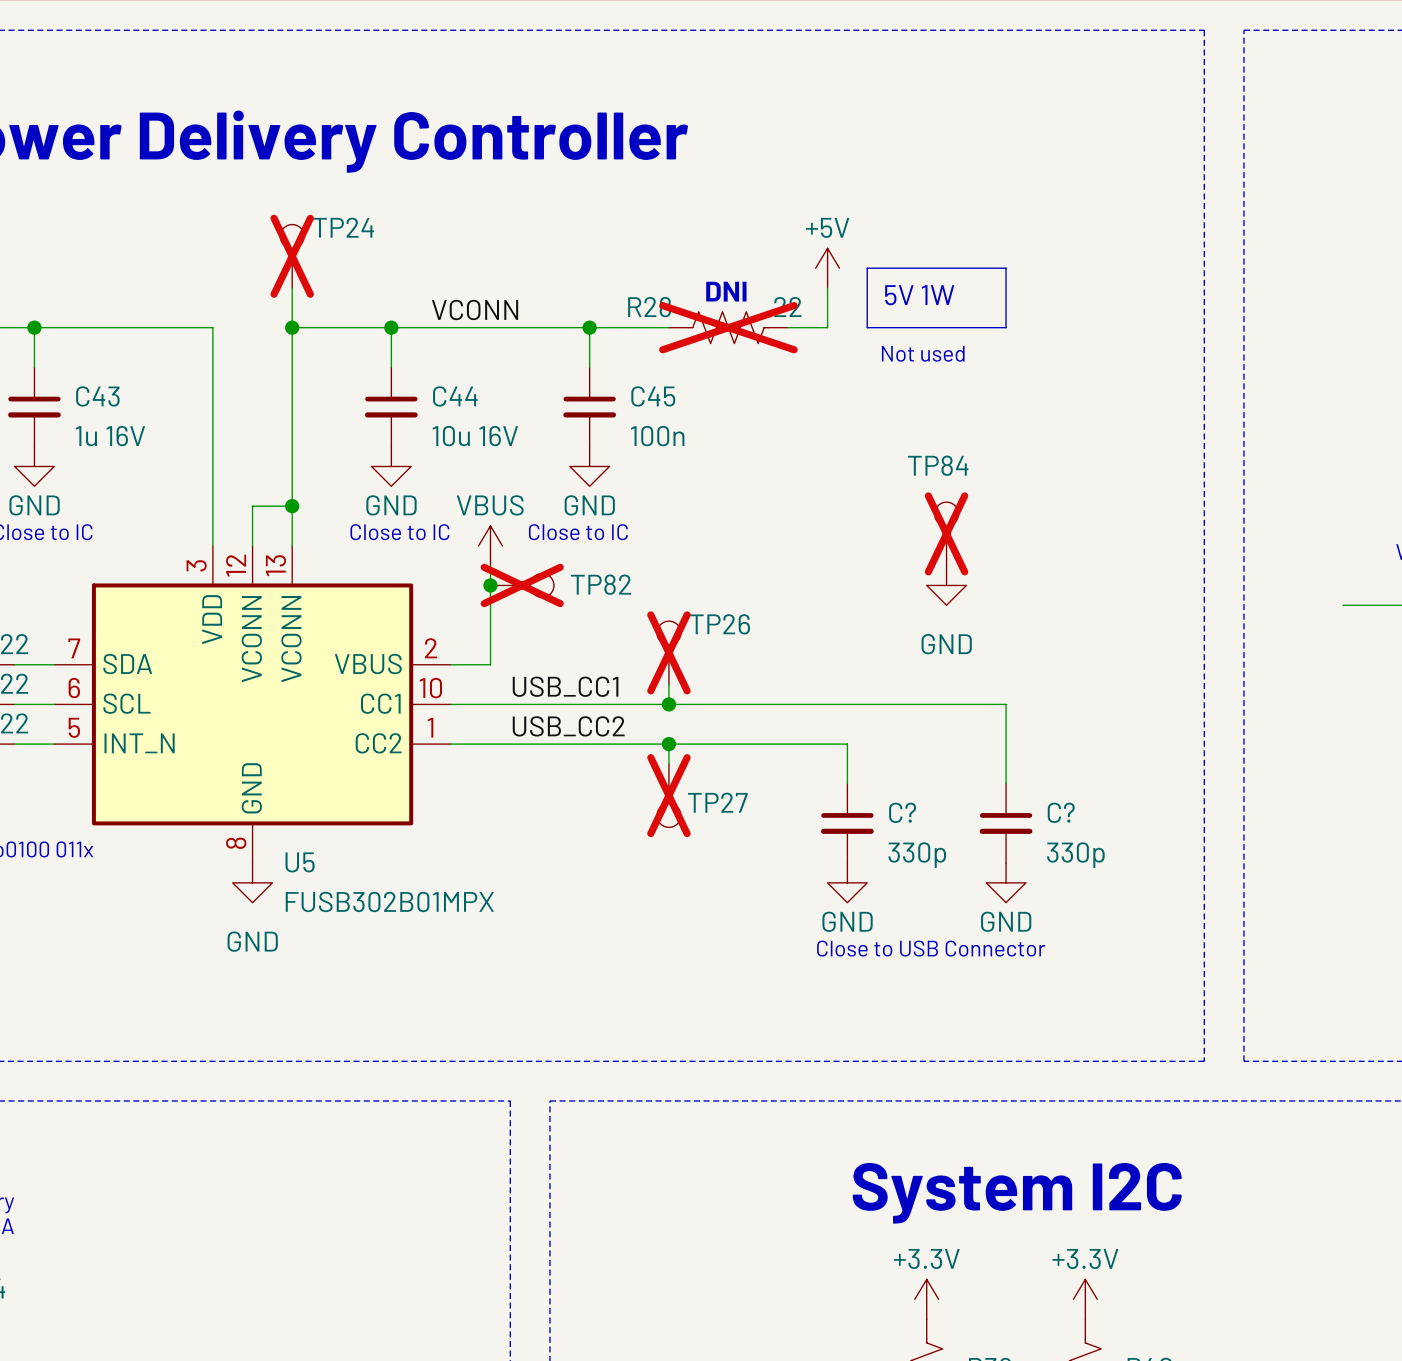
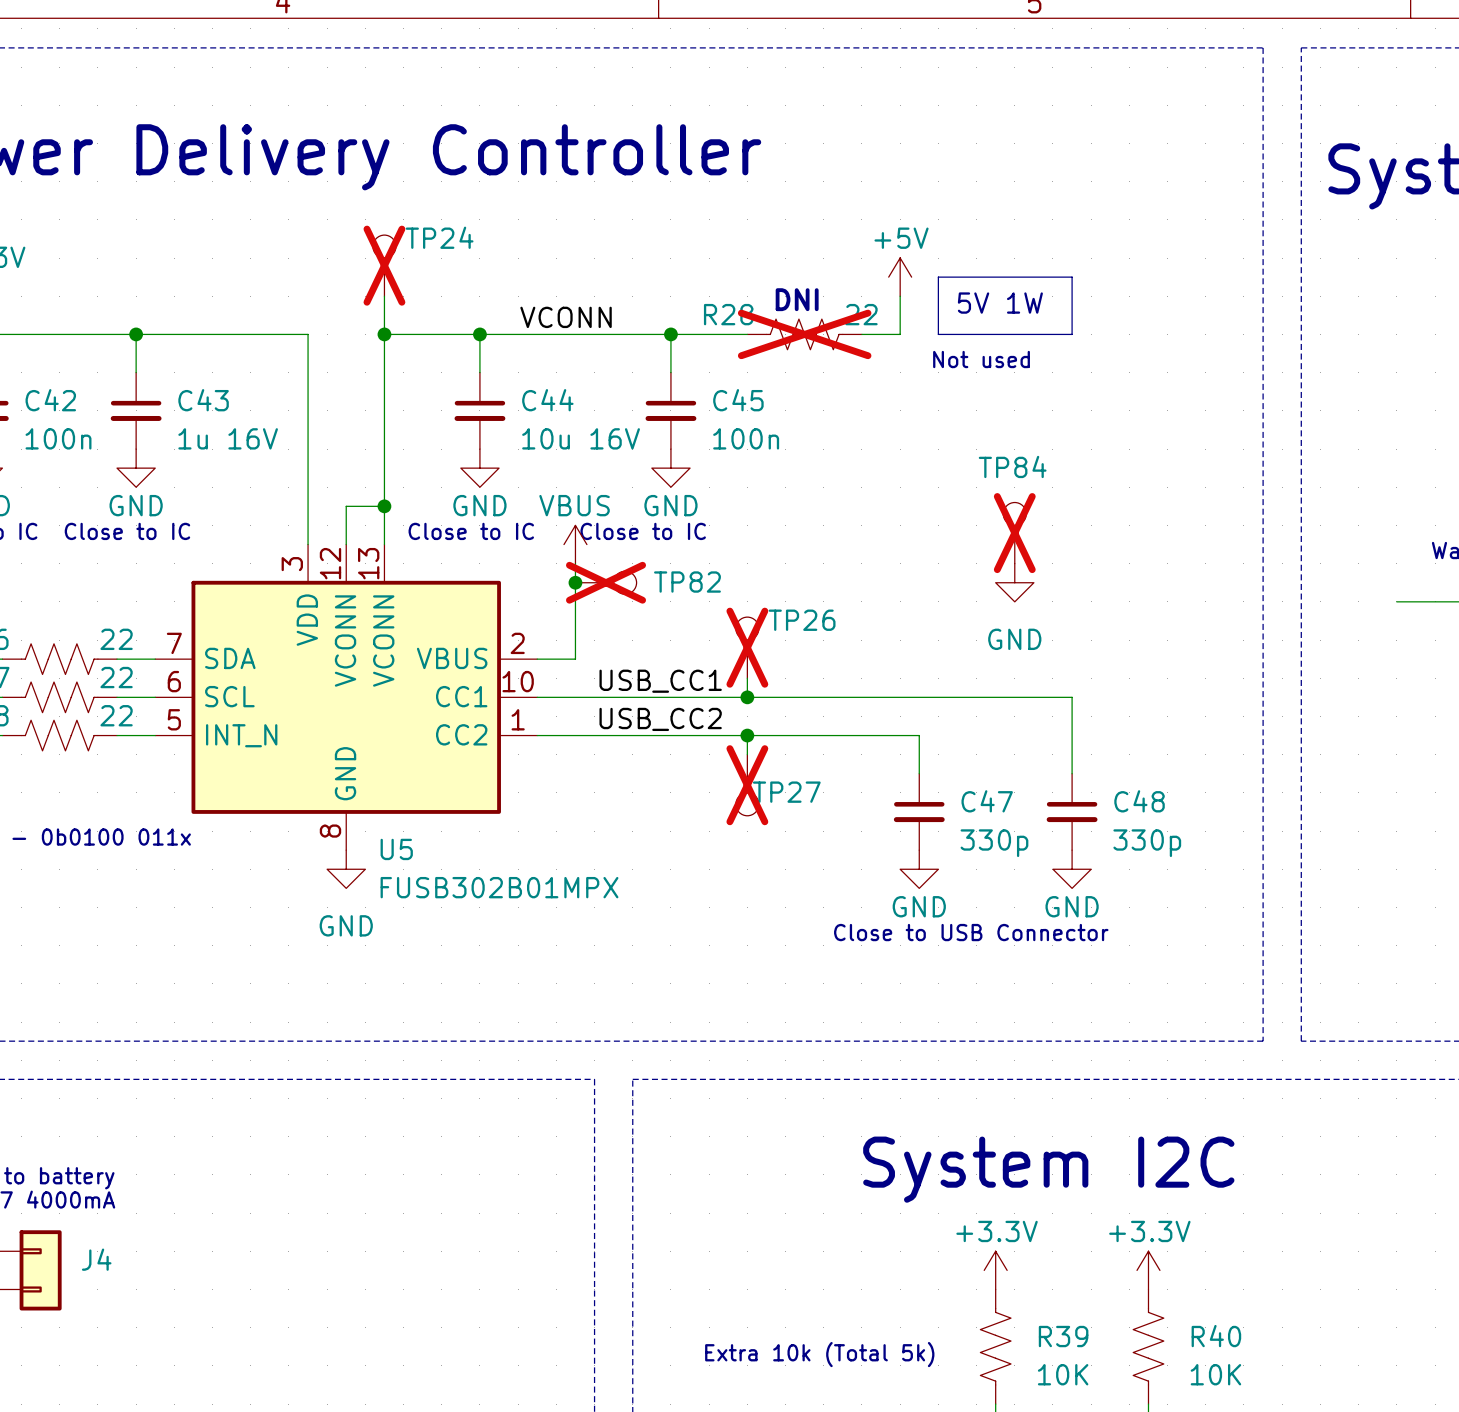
C? name: C? (902, 812) -> C47 (987, 801)
C? name: C? (1061, 812) -> C48 (1139, 801)

